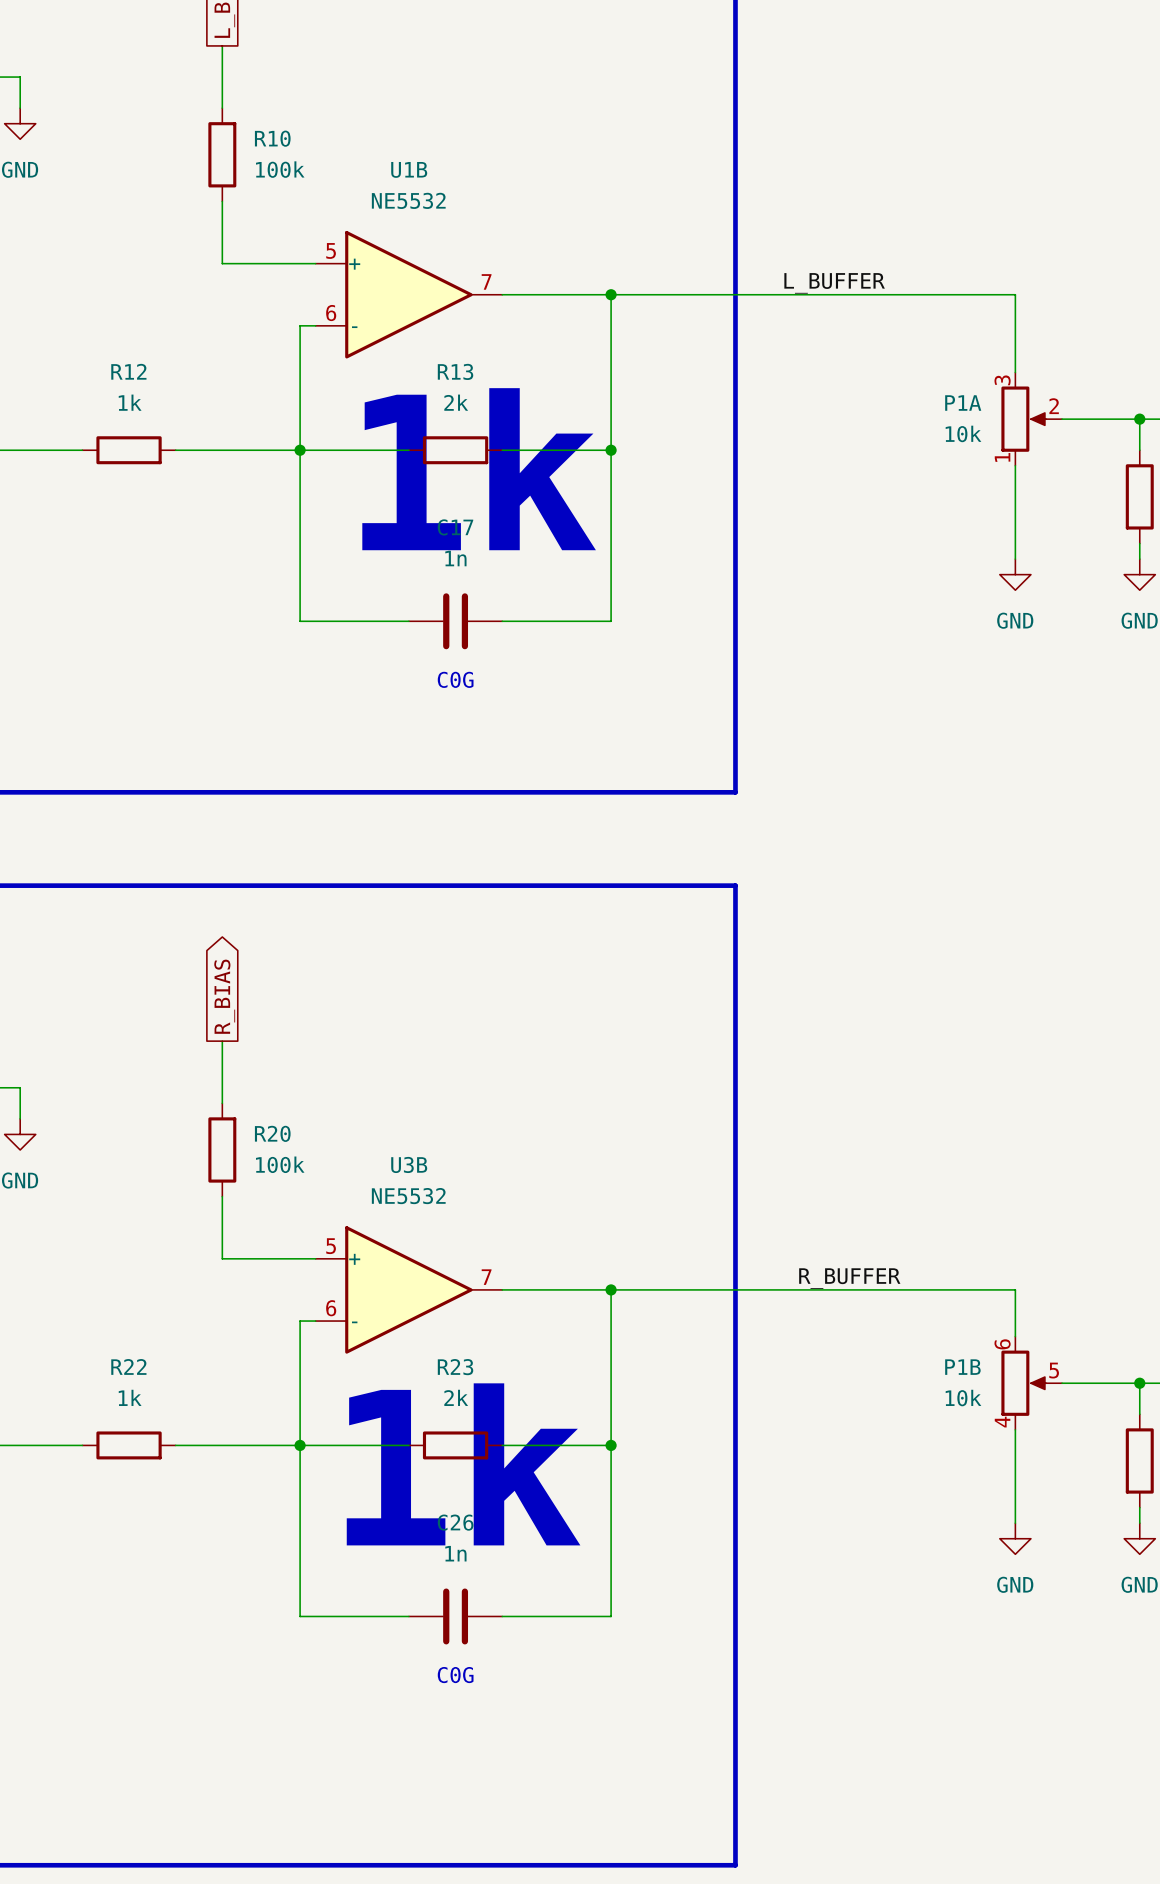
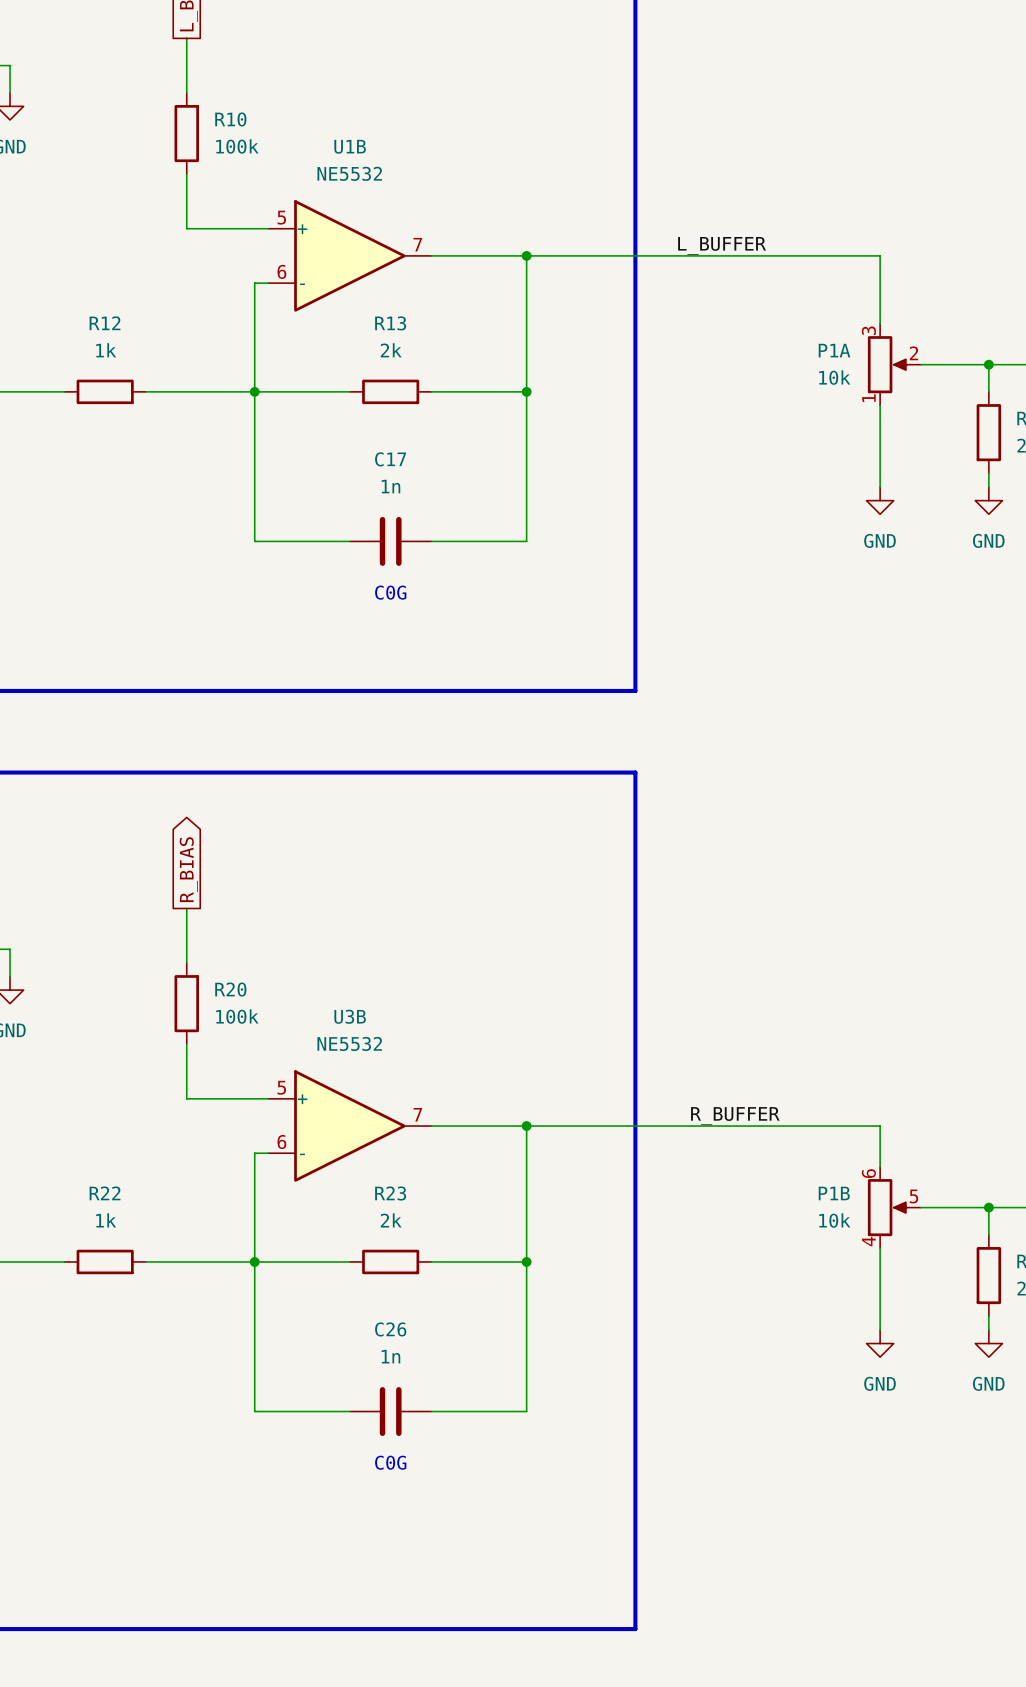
text: 1k (479, 469) -> none
text: 1k (463, 1464) -> none

